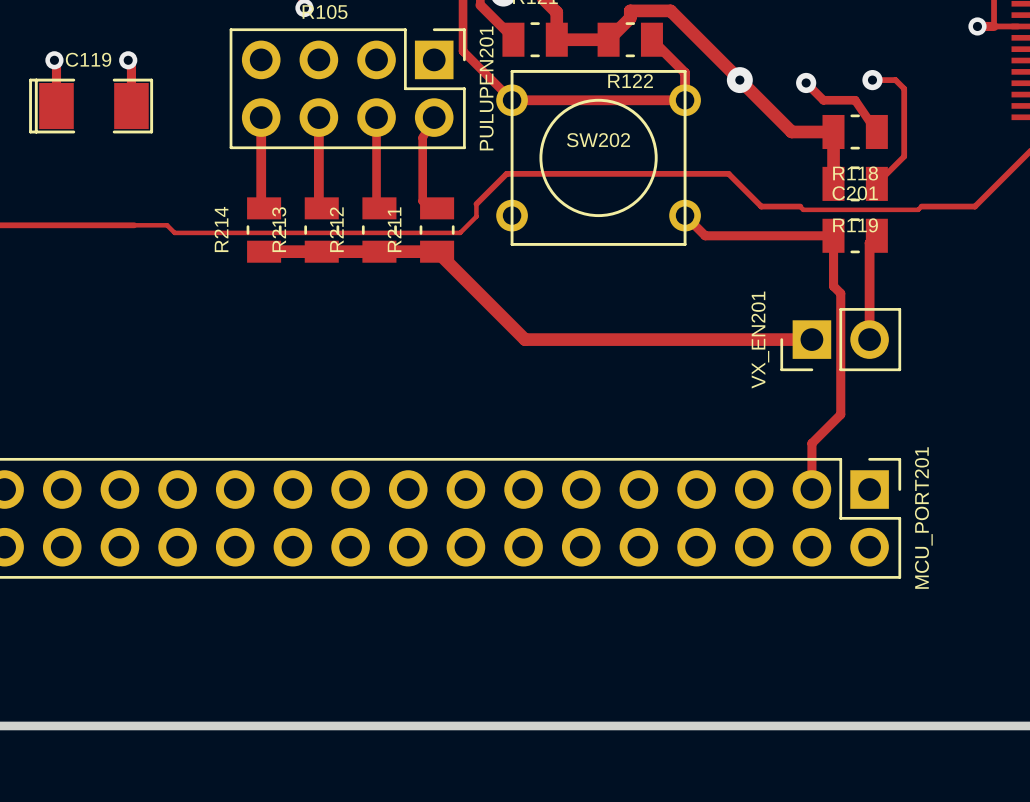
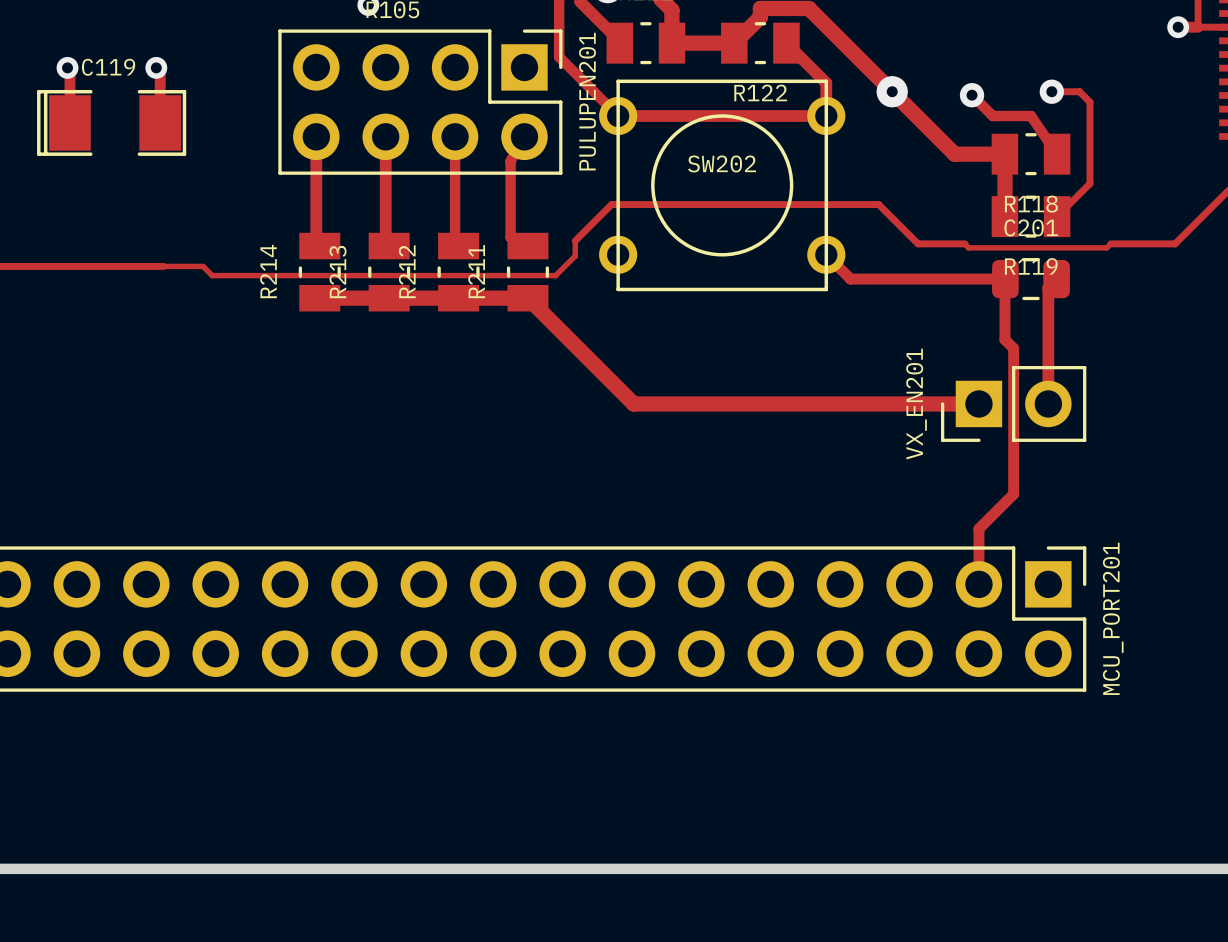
C201 footprint: [822, 218, 888, 254] -> [992, 258, 1070, 301]

